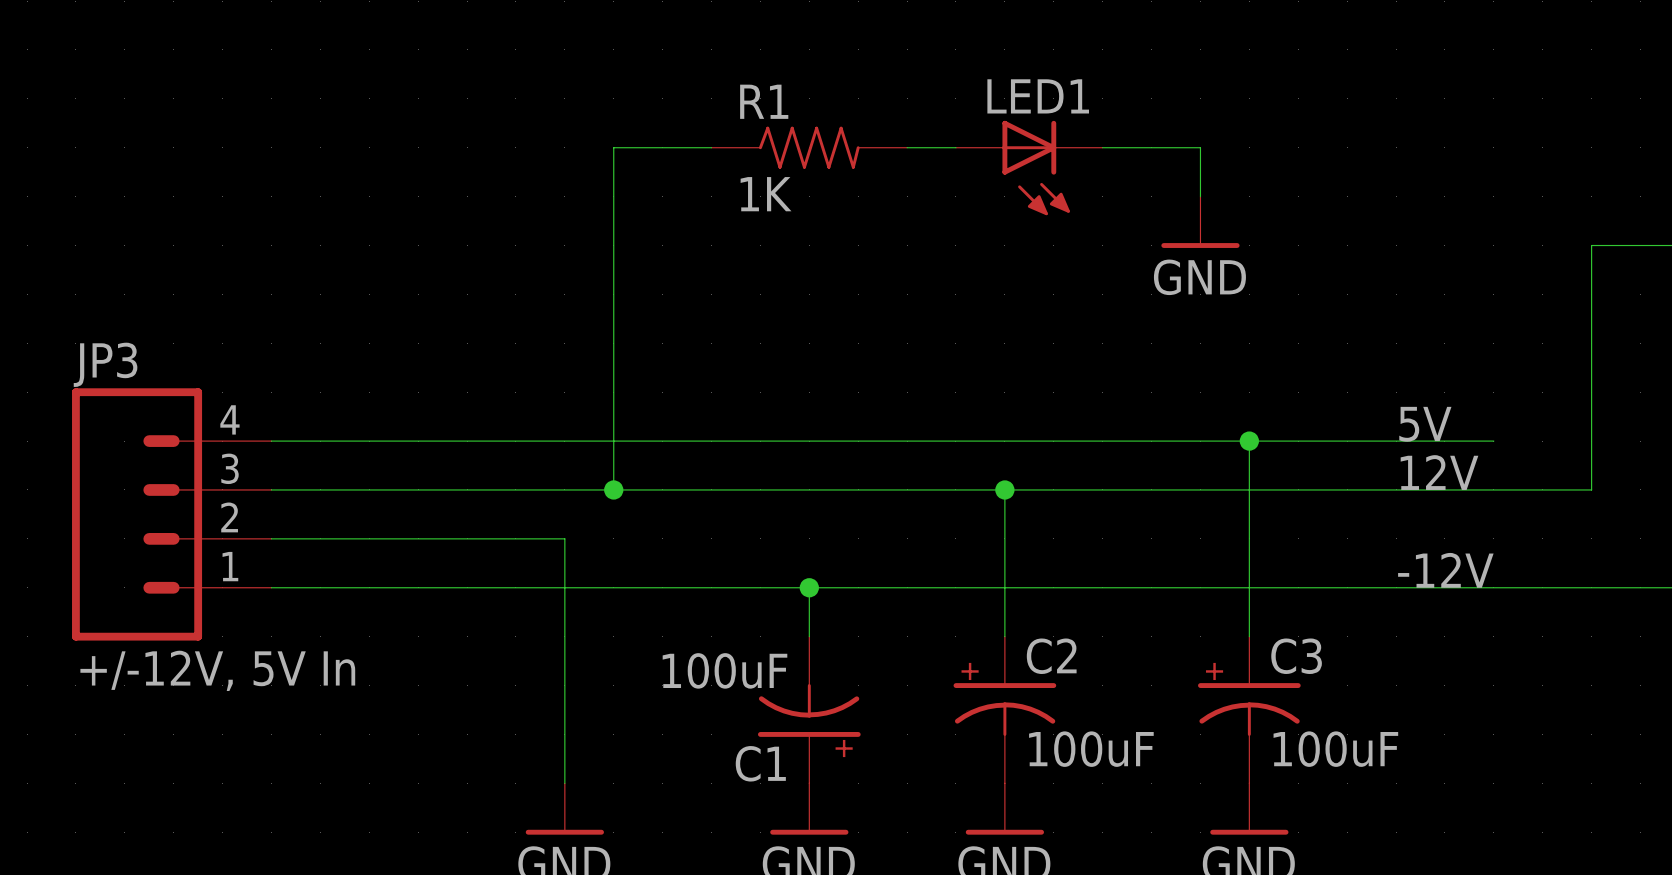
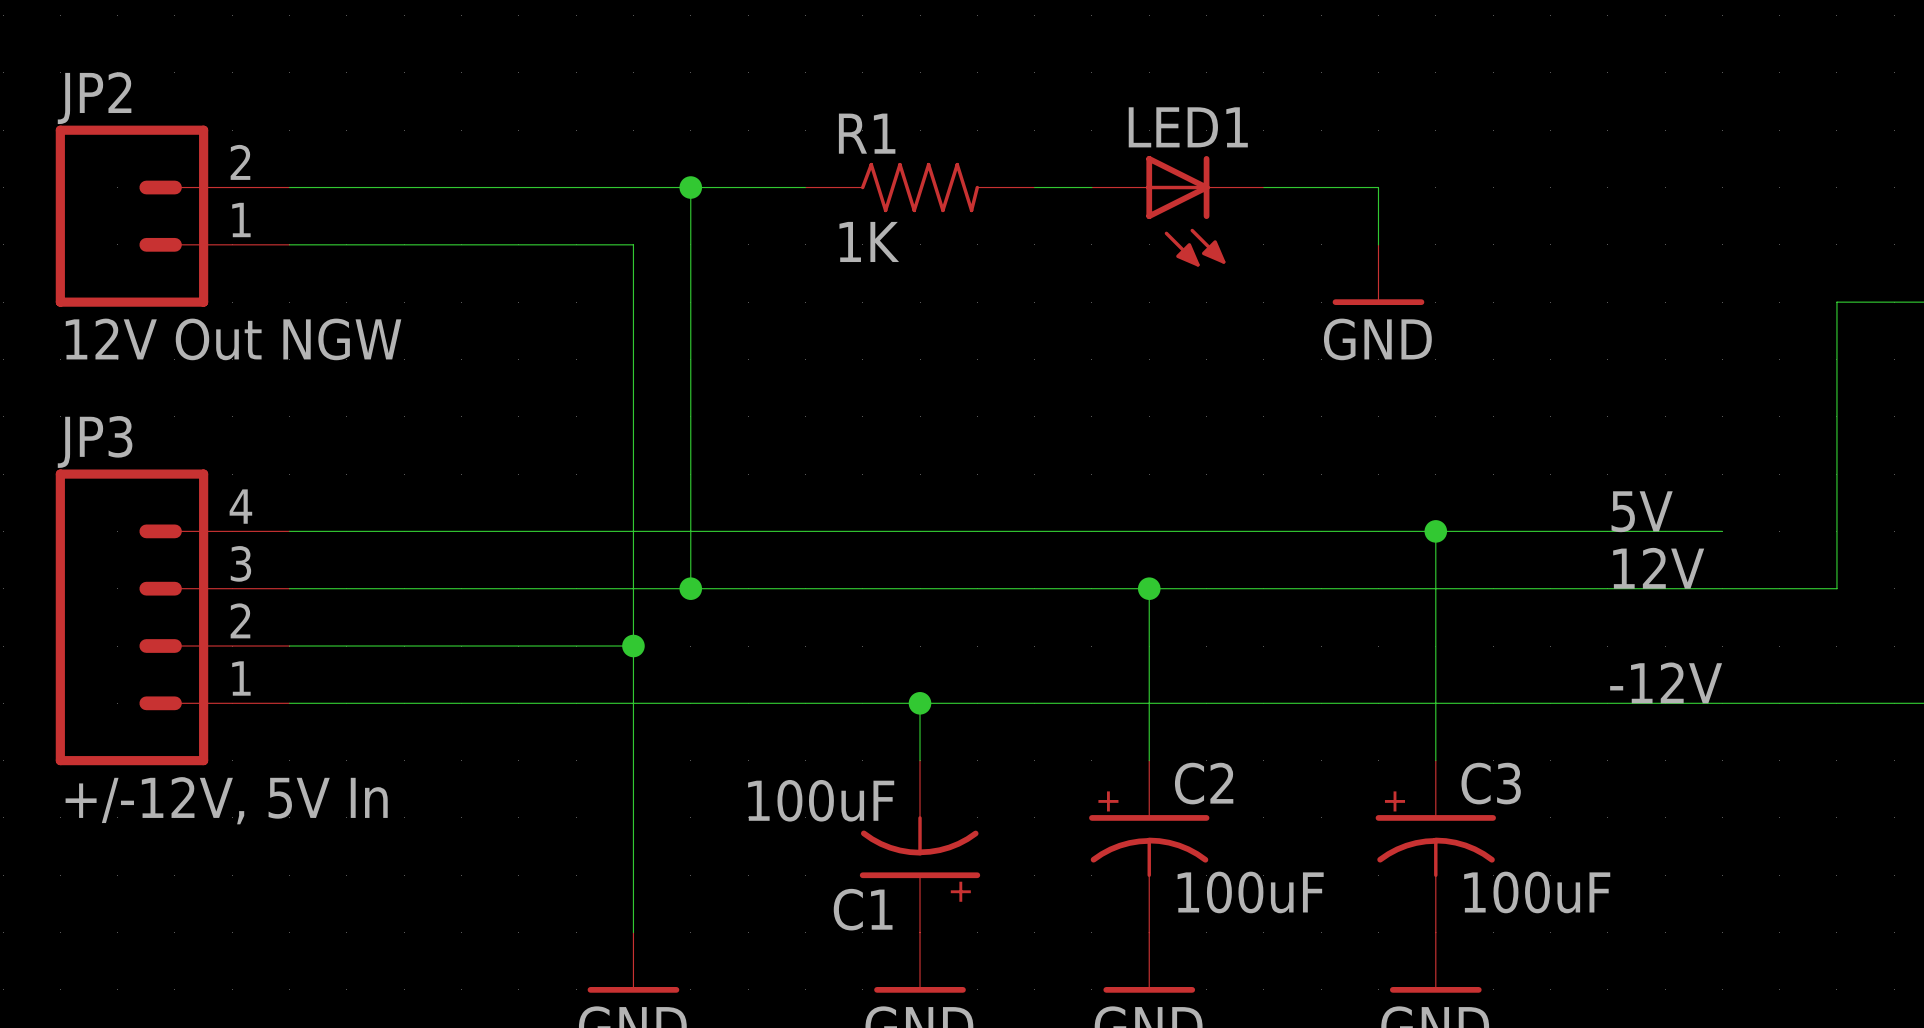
wire: none -> (289, 187) (690, 187)
junction: none -> (690, 187)
JP2: none -> 12V Out NGW (172, 216)
wire: none -> (289, 244) (633, 244) (633, 646)
junction: none -> (633, 646)

